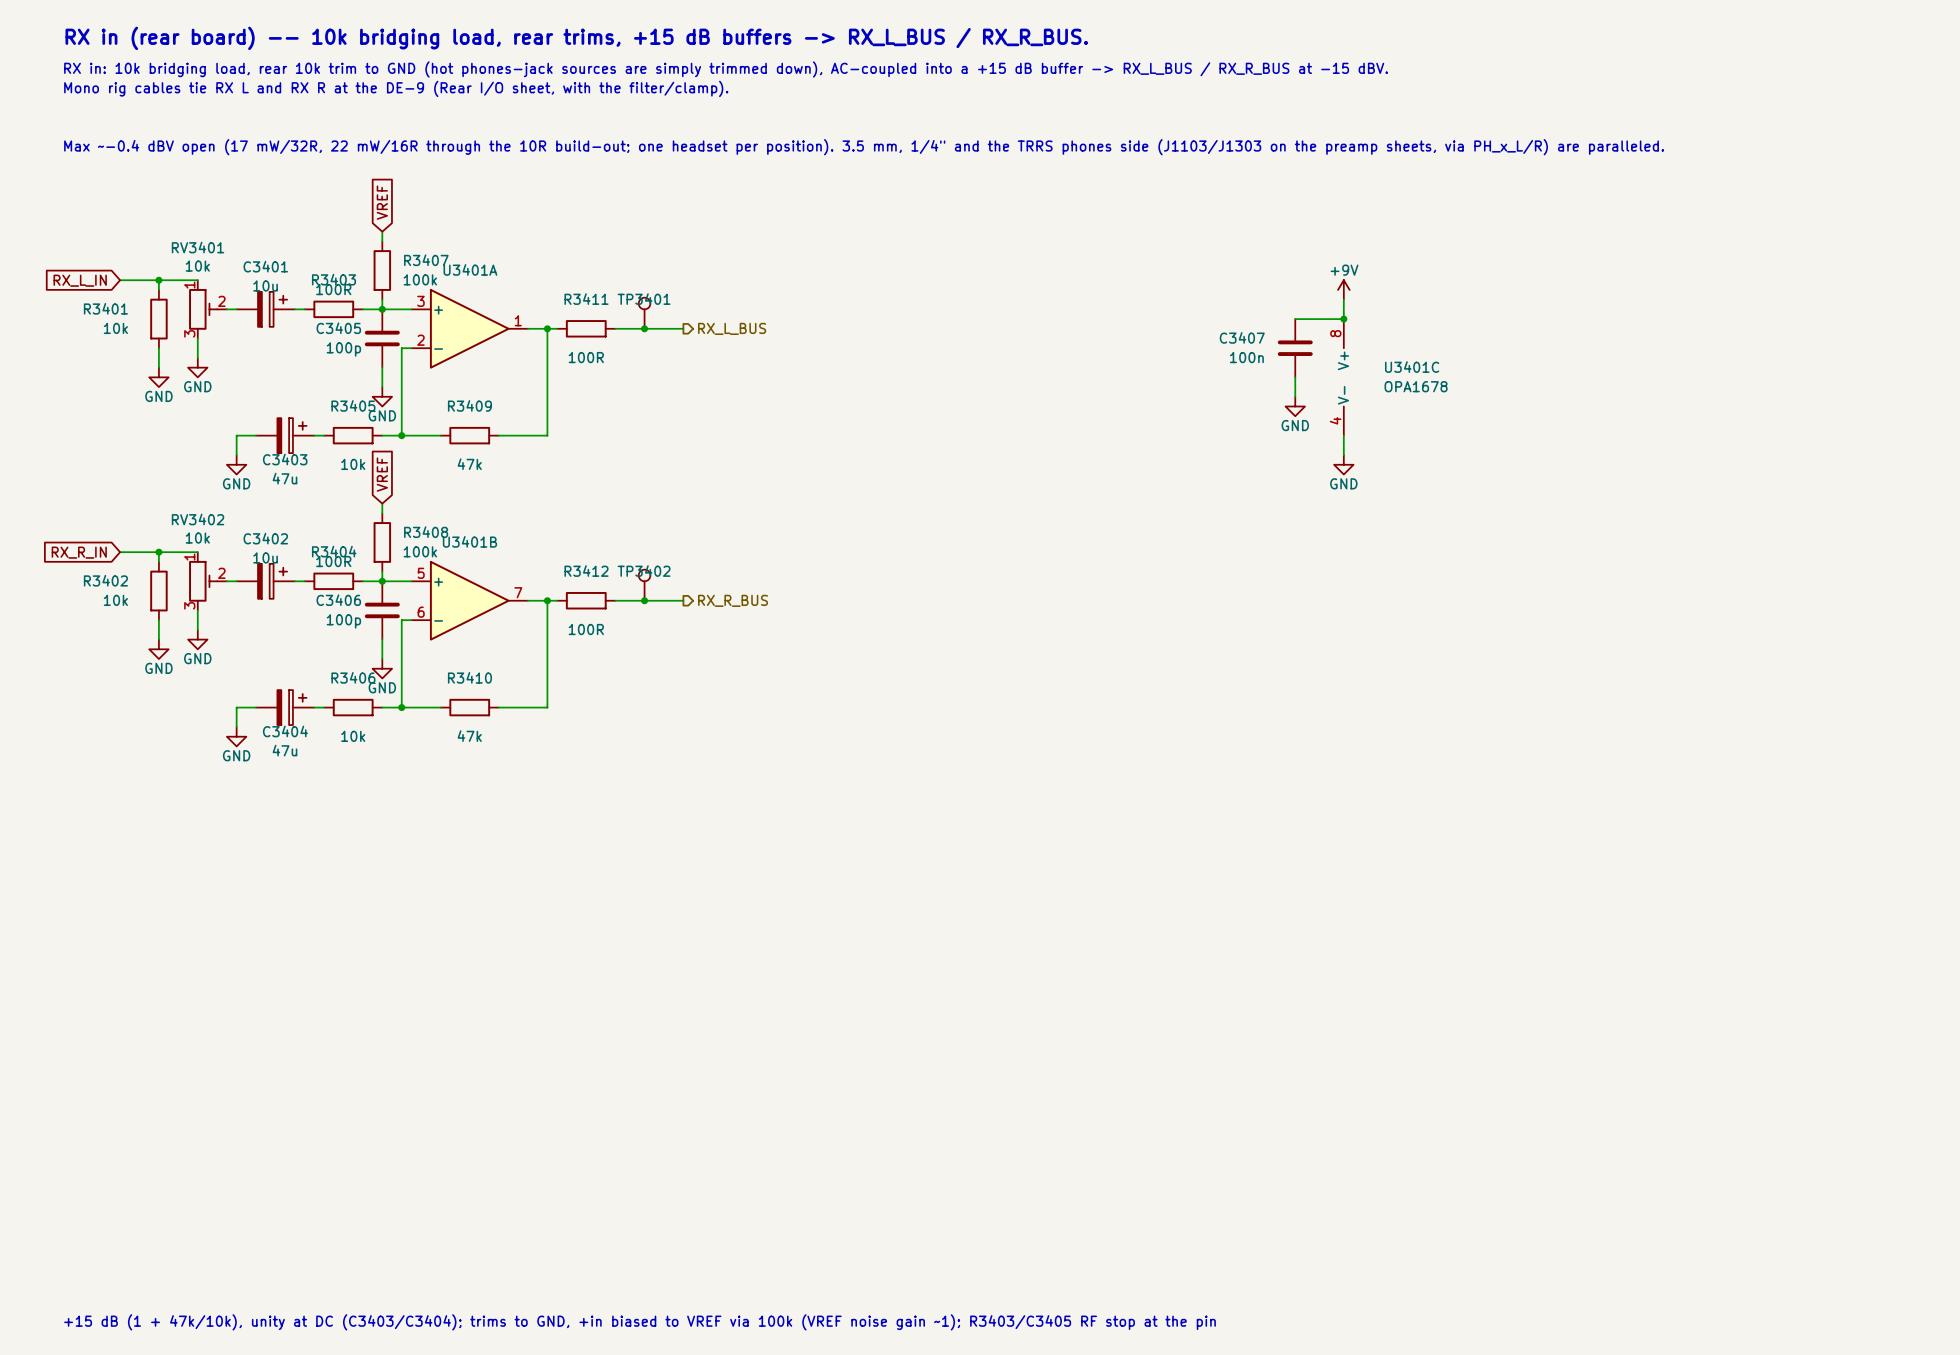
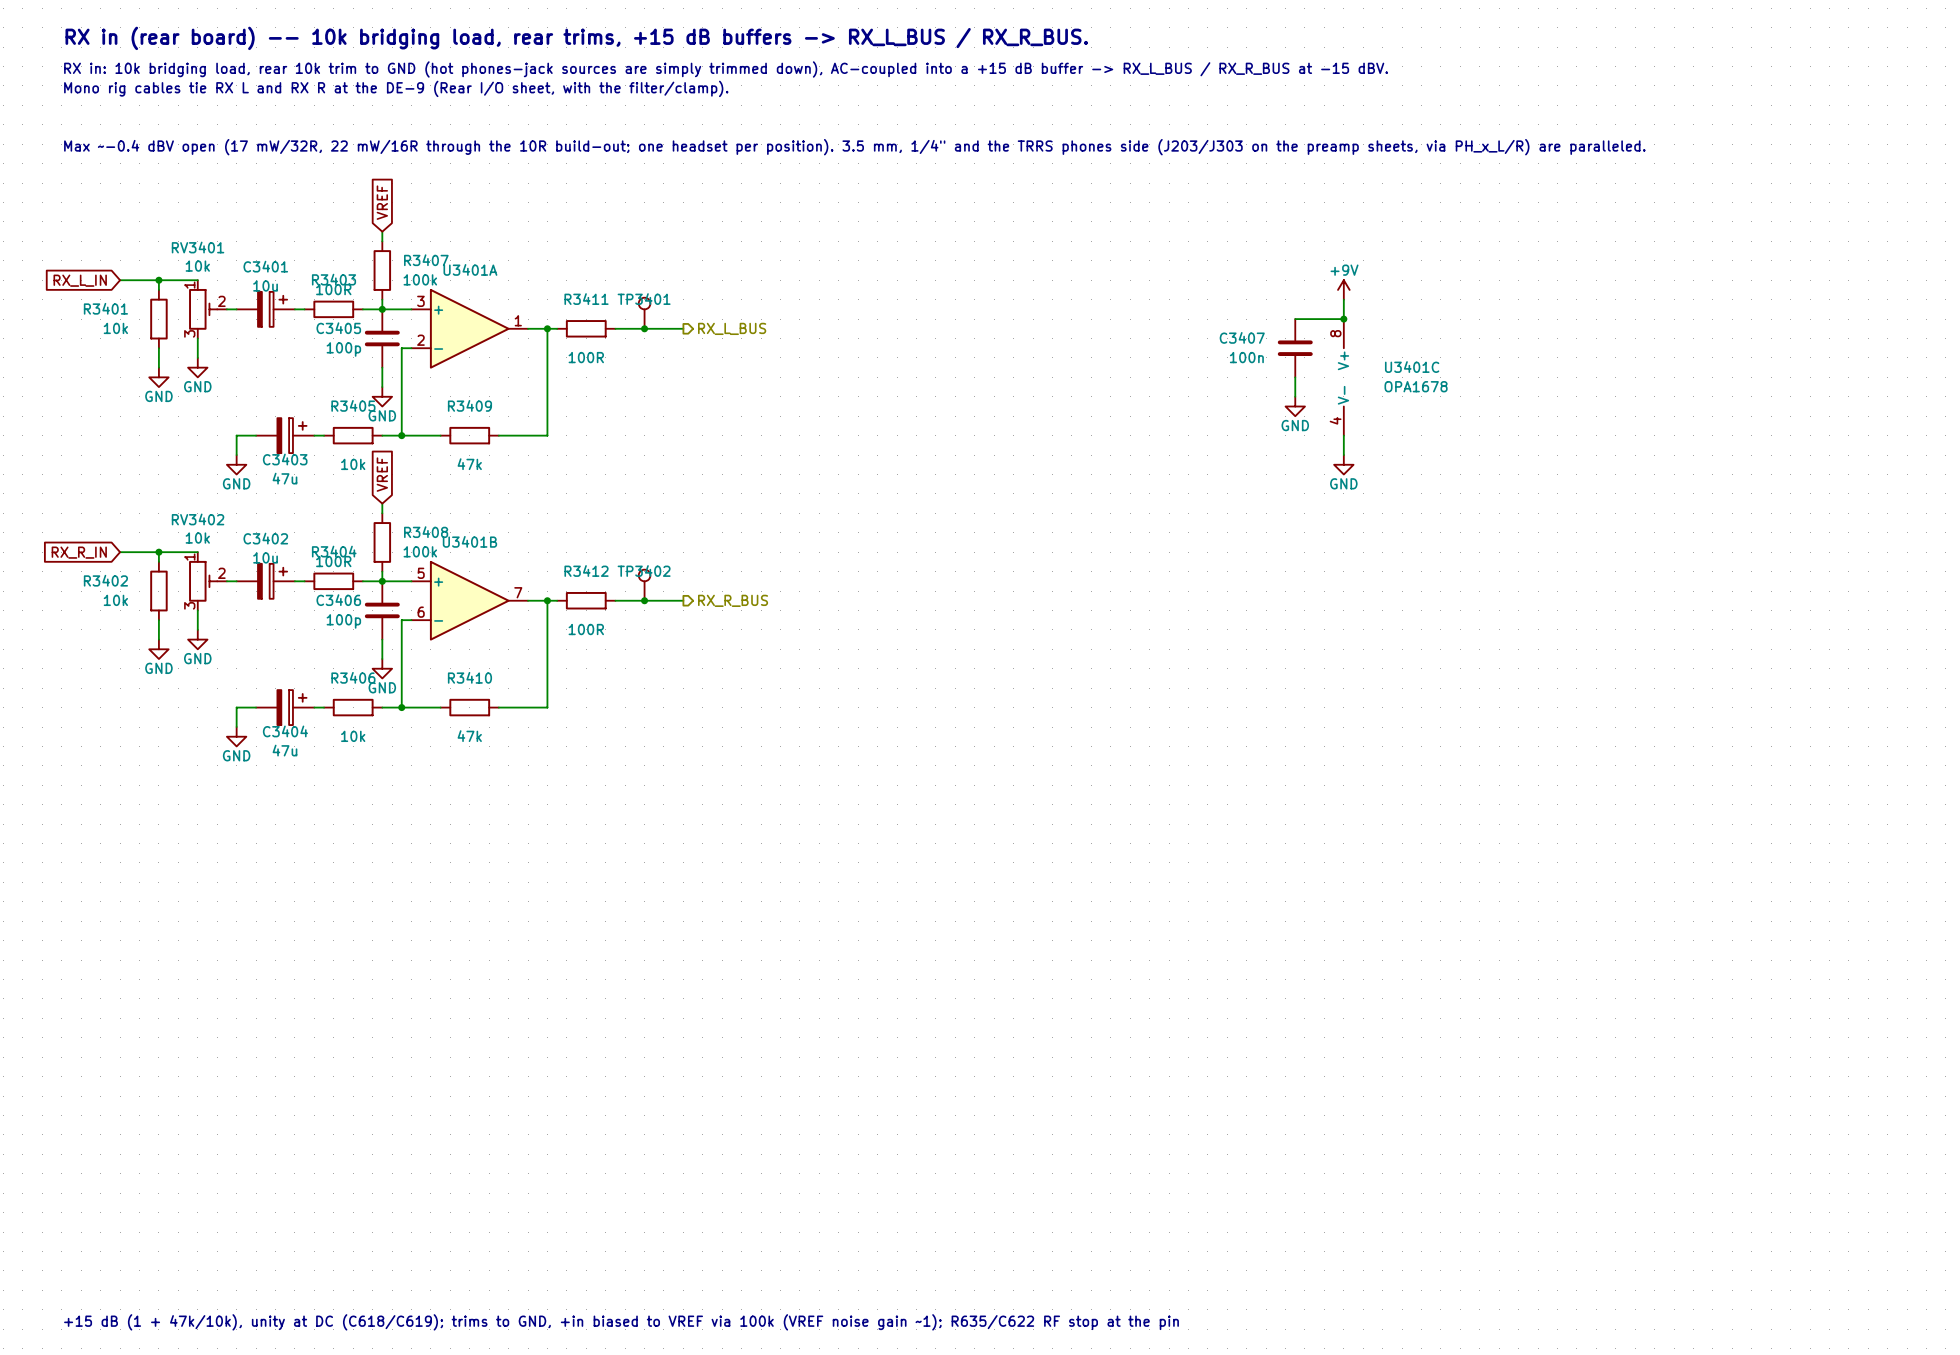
text: Max ~-0.4 dBV open (17 mW/32R, 22 mW/16R through the 10R build-out; one headset per position). 3.5 mm, 1/4" and the TRRS phones side (J1103/J1303 on the preamp sheets, via PH_x_L/R) are paralleled. (864, 147) -> Max ~-0.4 dBV open (17 mW/32R, 22 mW/16R through the 10R build-out; one headset per position). 3.5 mm, 1/4" and the TRRS phones side (J203/J303 on the preamp sheets, via PH_x_L/R) are paralleled. (854, 147)
text: +15 dB (1 + 47k/10k), unity at DC (C3403/C3404); trims to GND, +in biased to VREF via 100k (VREF noise gain ~1); R3403/C3405 RF stop at the pin (640, 1322) -> +15 dB (1 + 47k/10k), unity at DC (C618/C619); trims to GND, +in biased to VREF via 100k (VREF noise gain ~1); R635/C622 RF stop at the pin (621, 1322)

